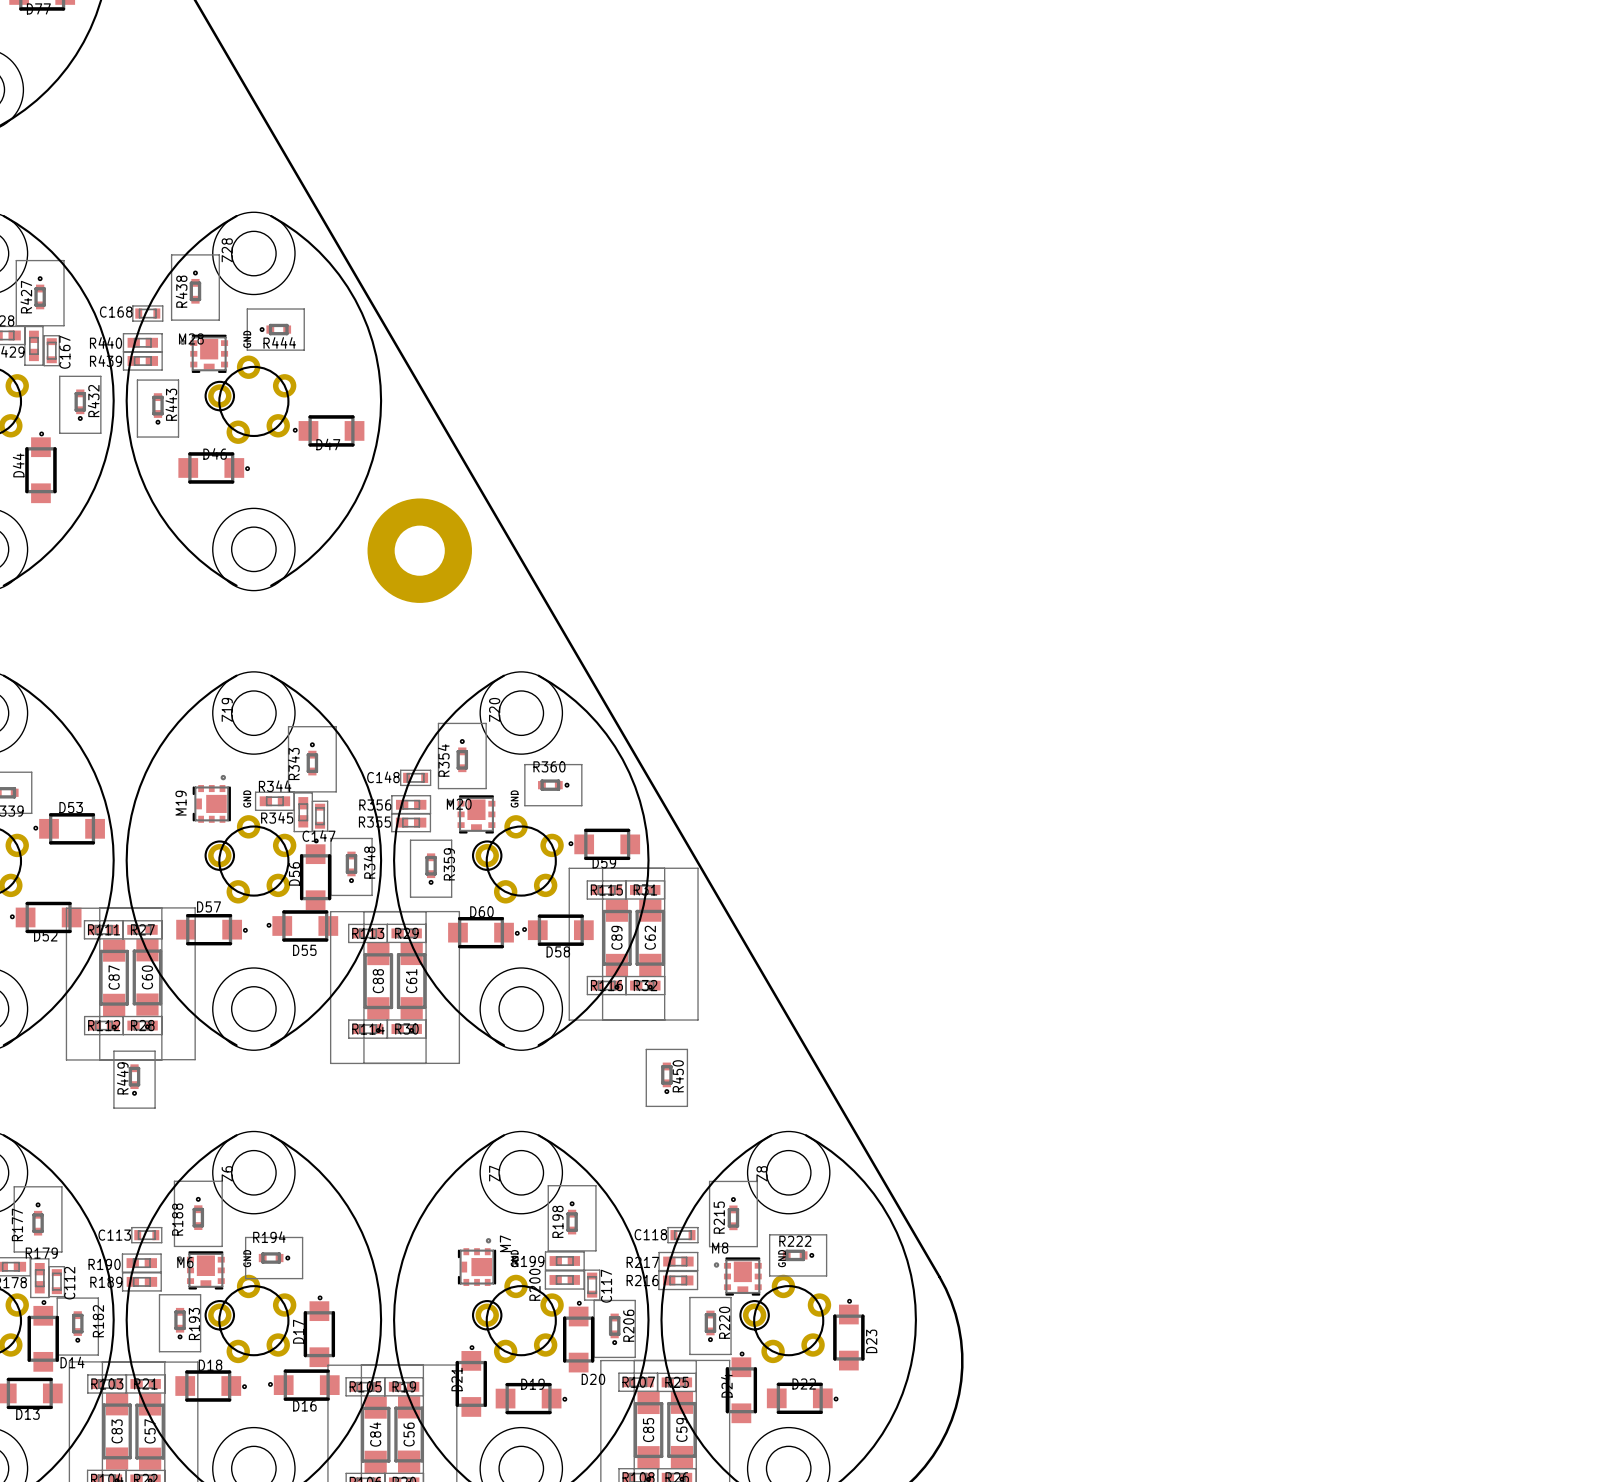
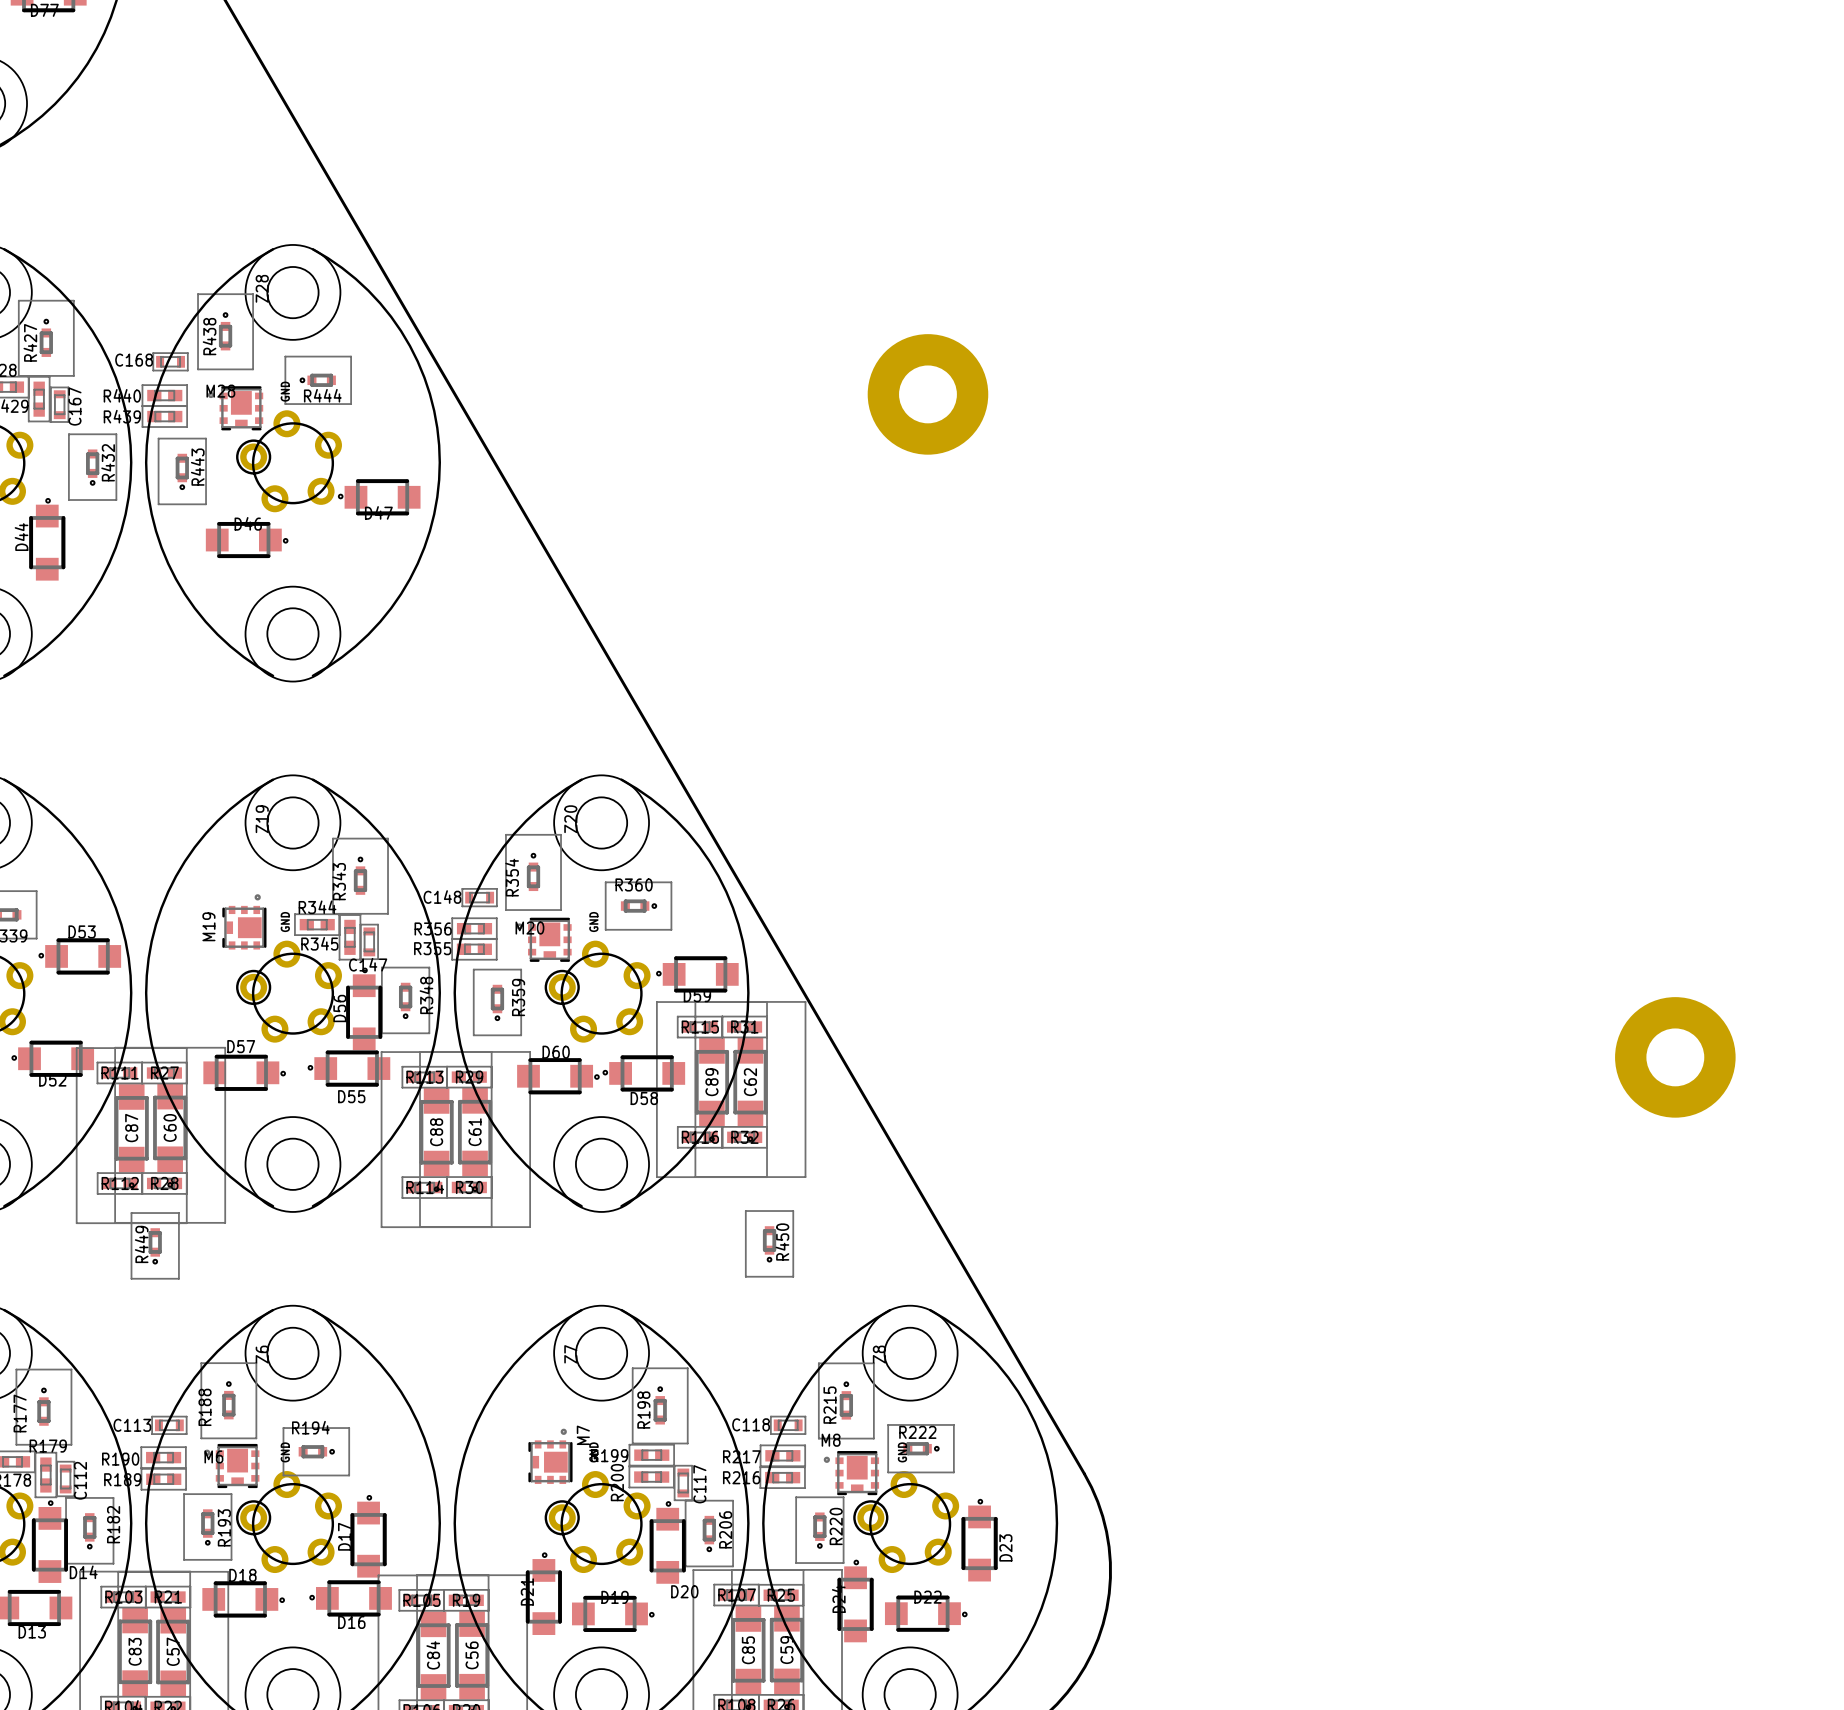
part: none -> (927, 394)
part: (419, 550) -> none
part: none -> (1675, 1057)

